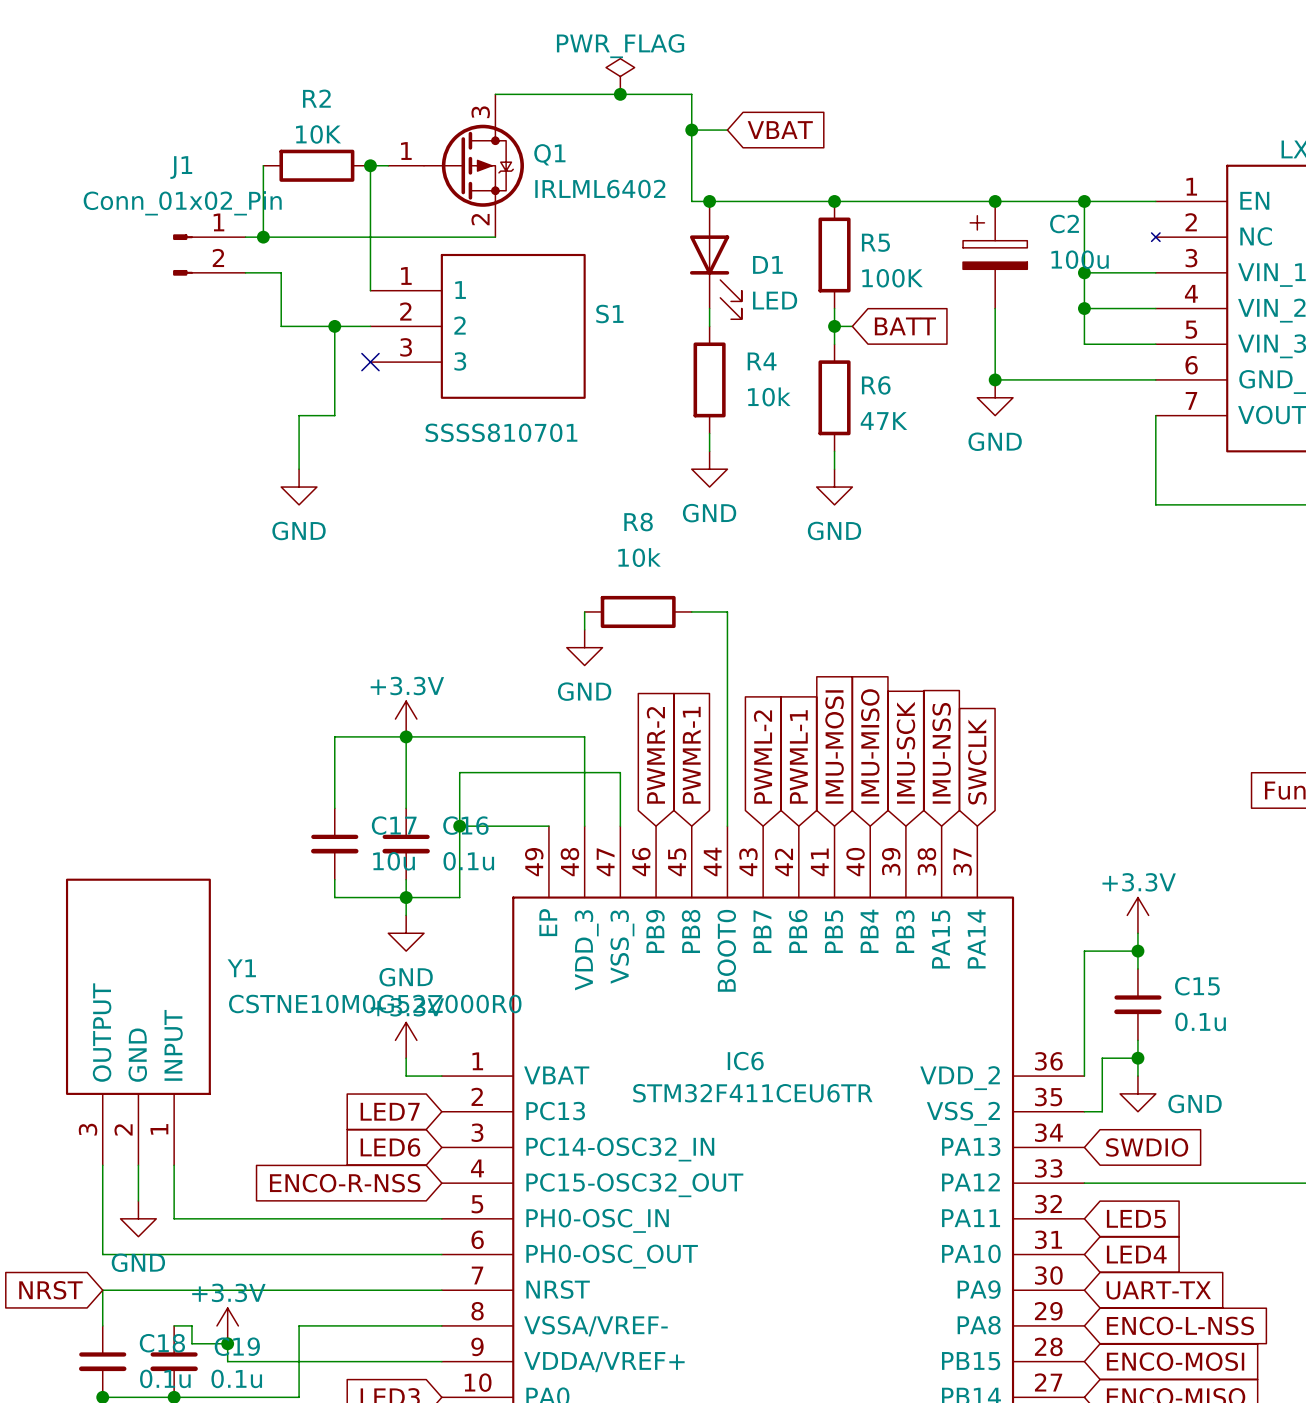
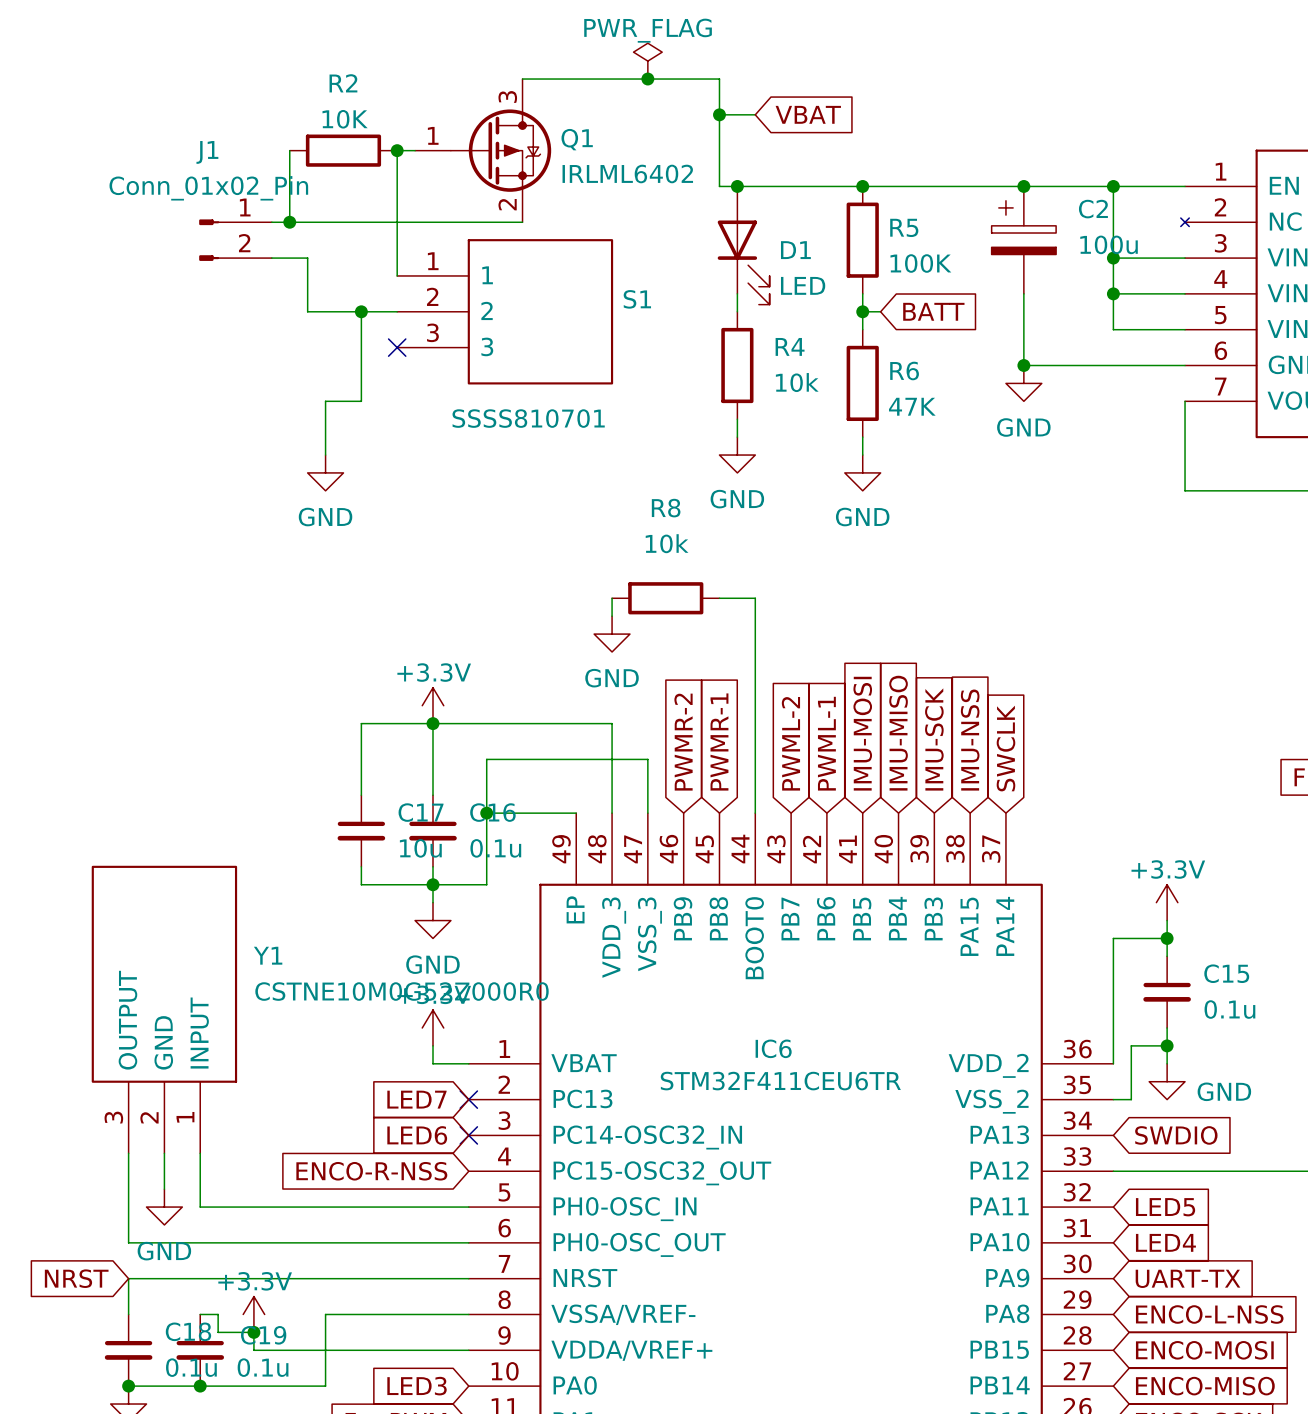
no-connect mark: none -> (468, 1099)
no-connect mark: none -> (468, 1135)

